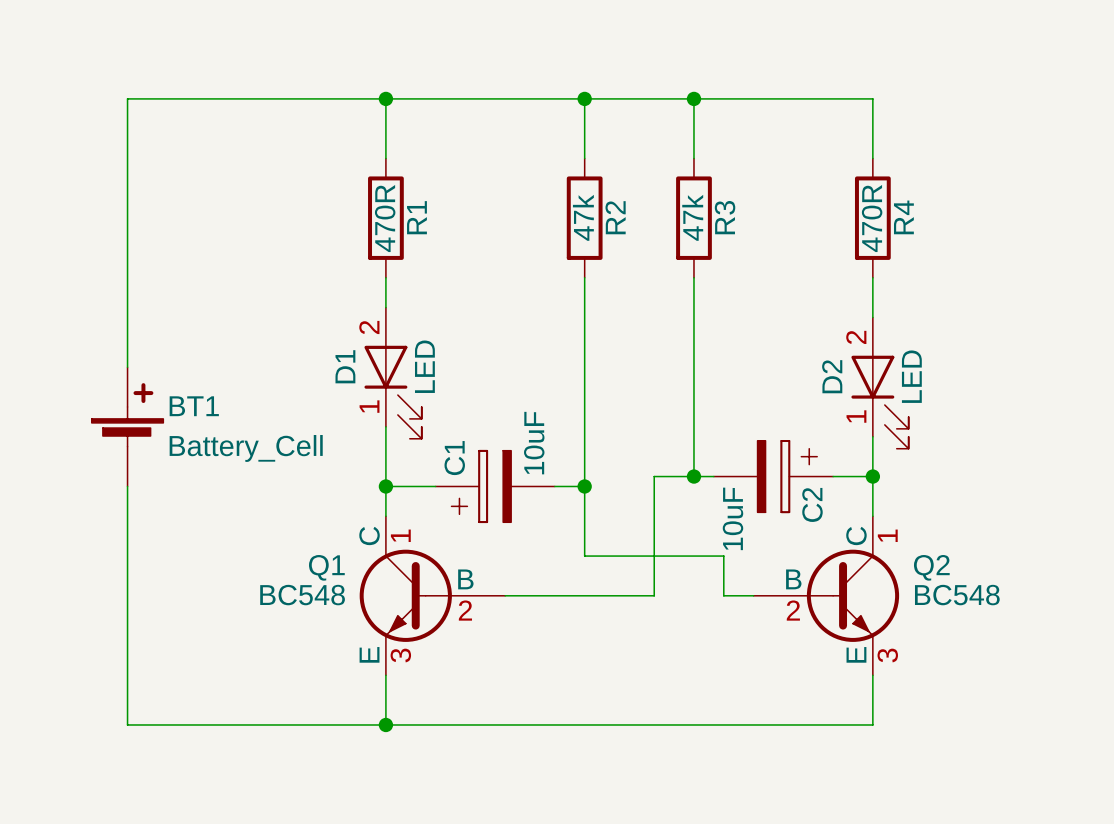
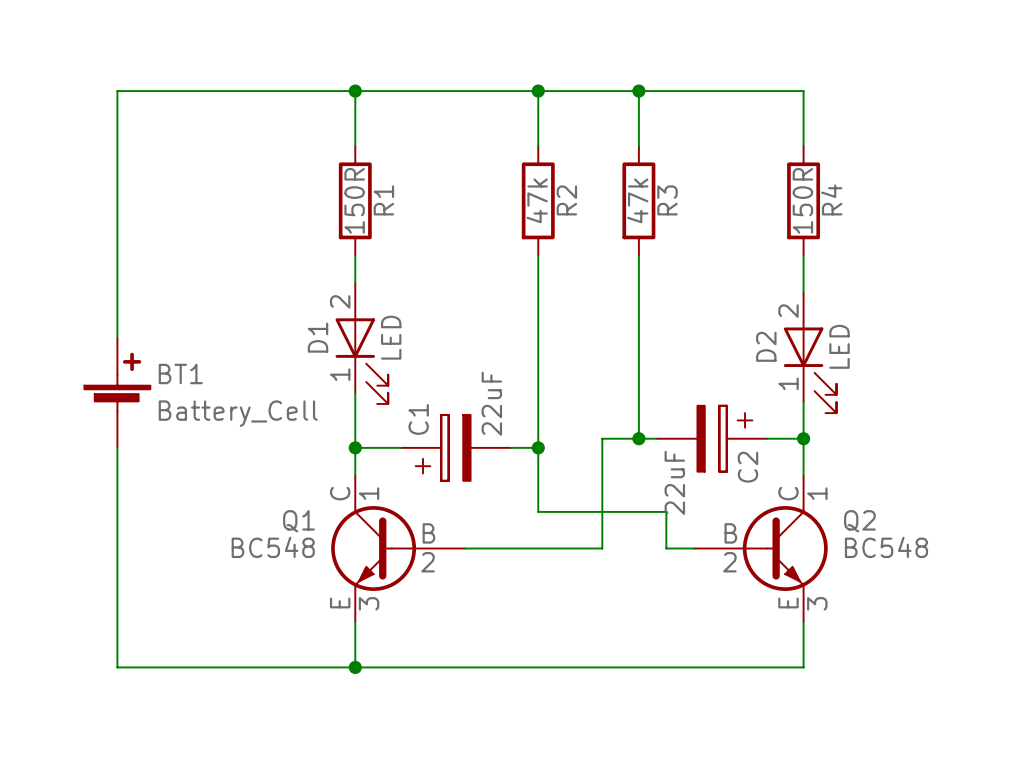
R1 value: 470R (385, 218) -> 150R (354, 200)
R4 value: 470R (872, 218) -> 150R (802, 200)
C1 value: 10uF (534, 443) -> 22uF (491, 403)
C2 value: 10uF (732, 518) -> 22uF (674, 482)

